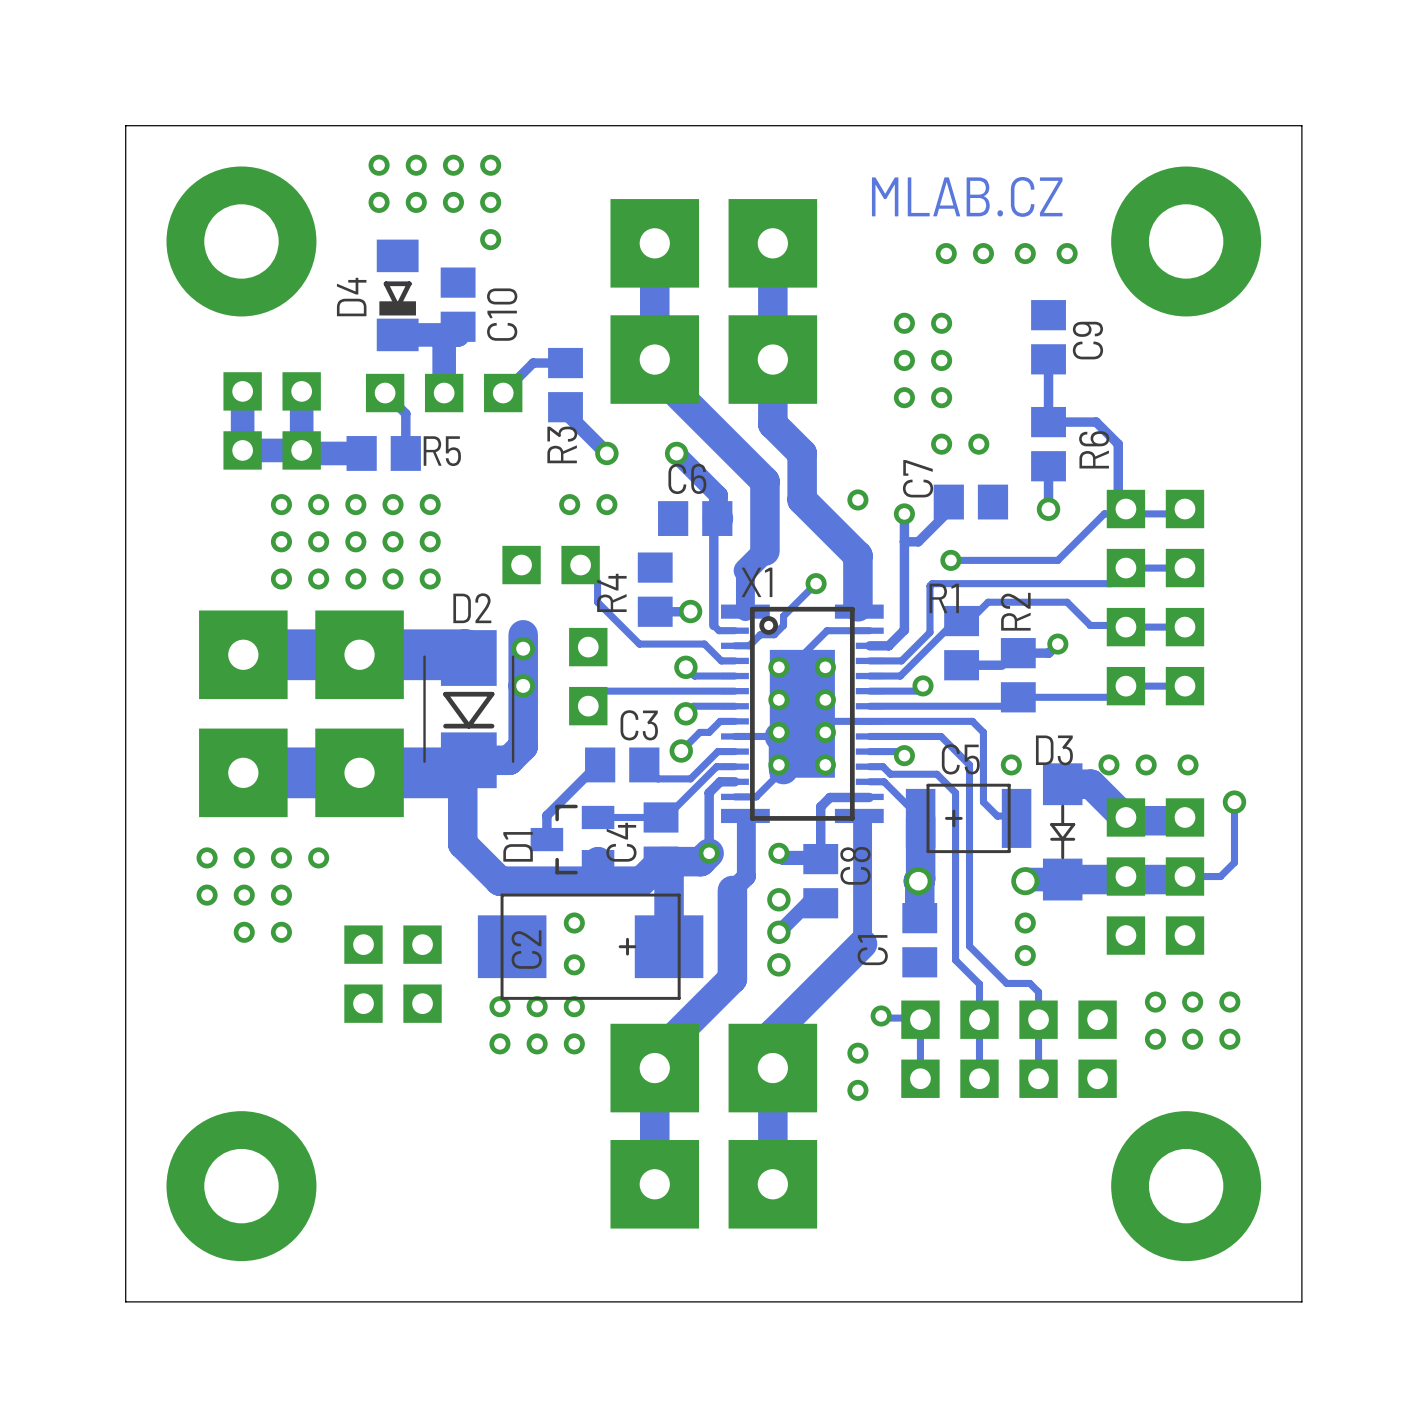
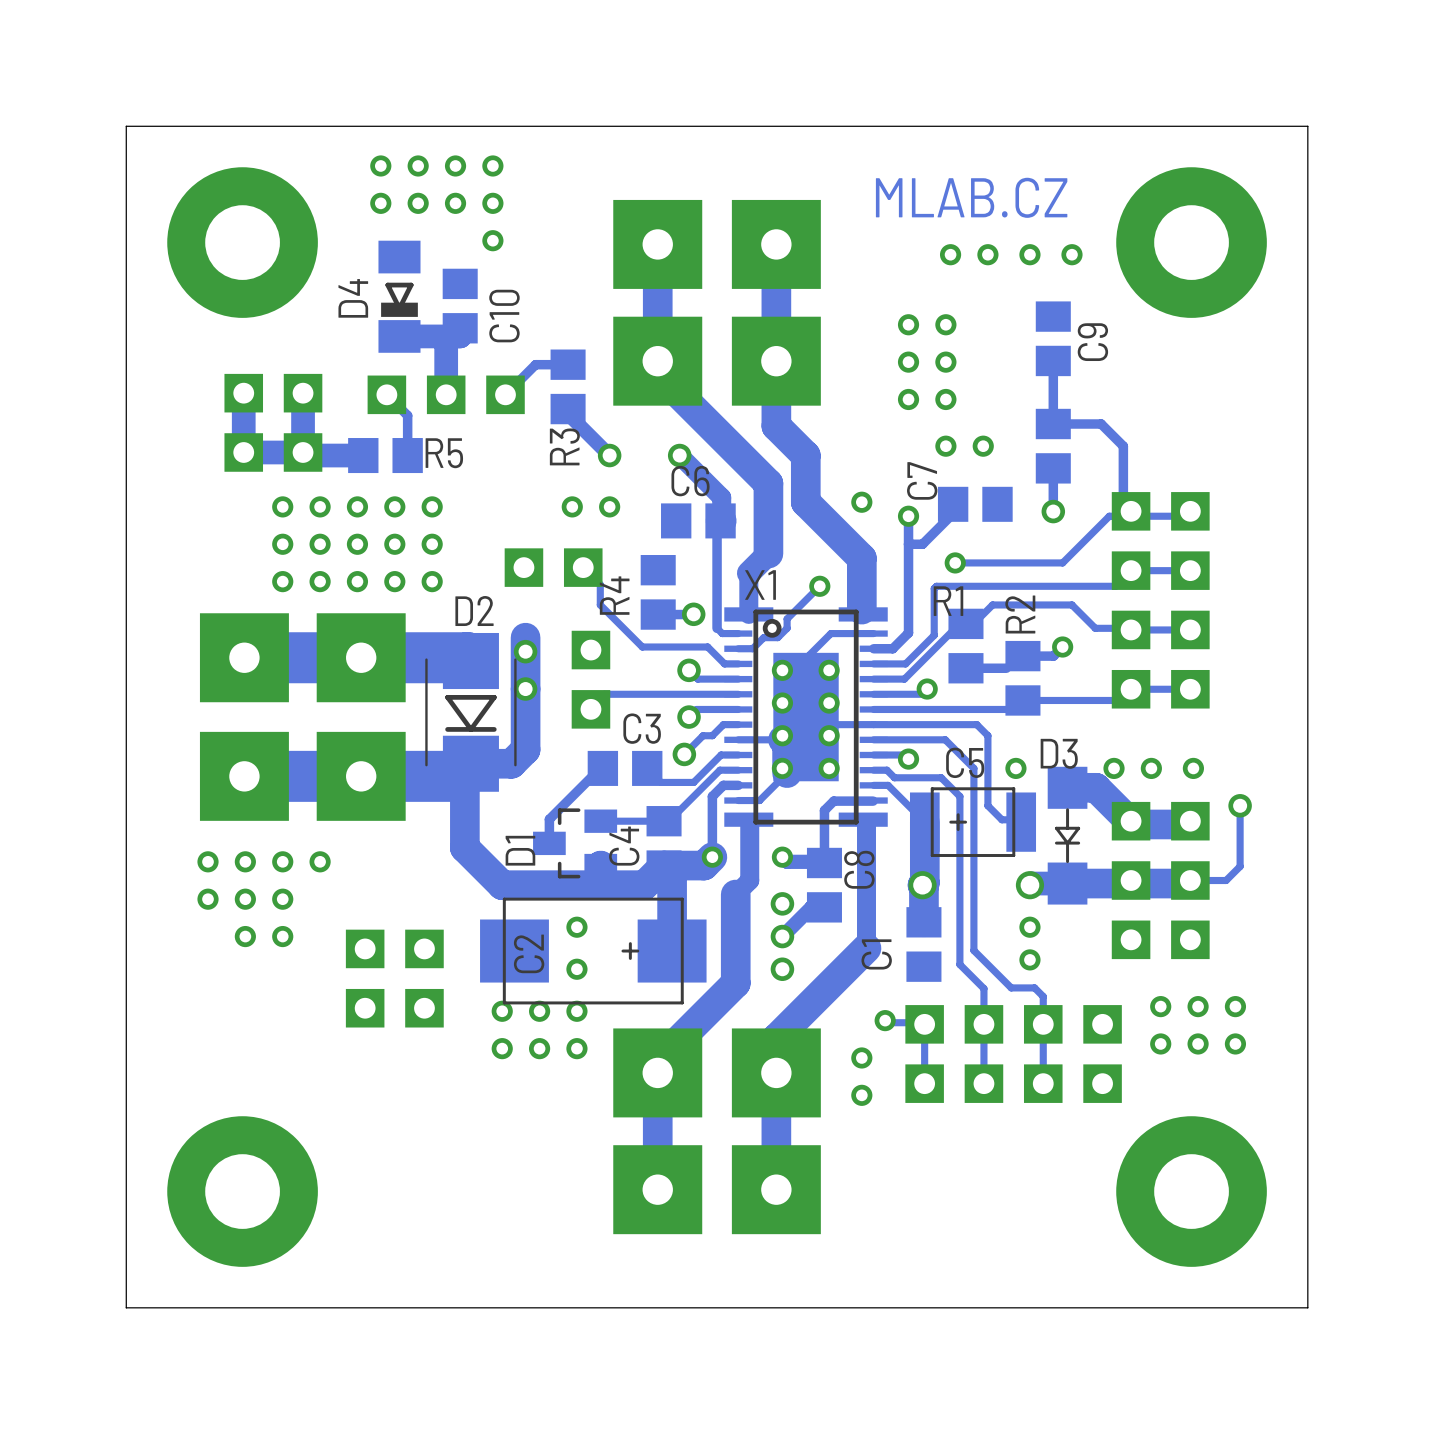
text: R6 (1094, 449) -> none

